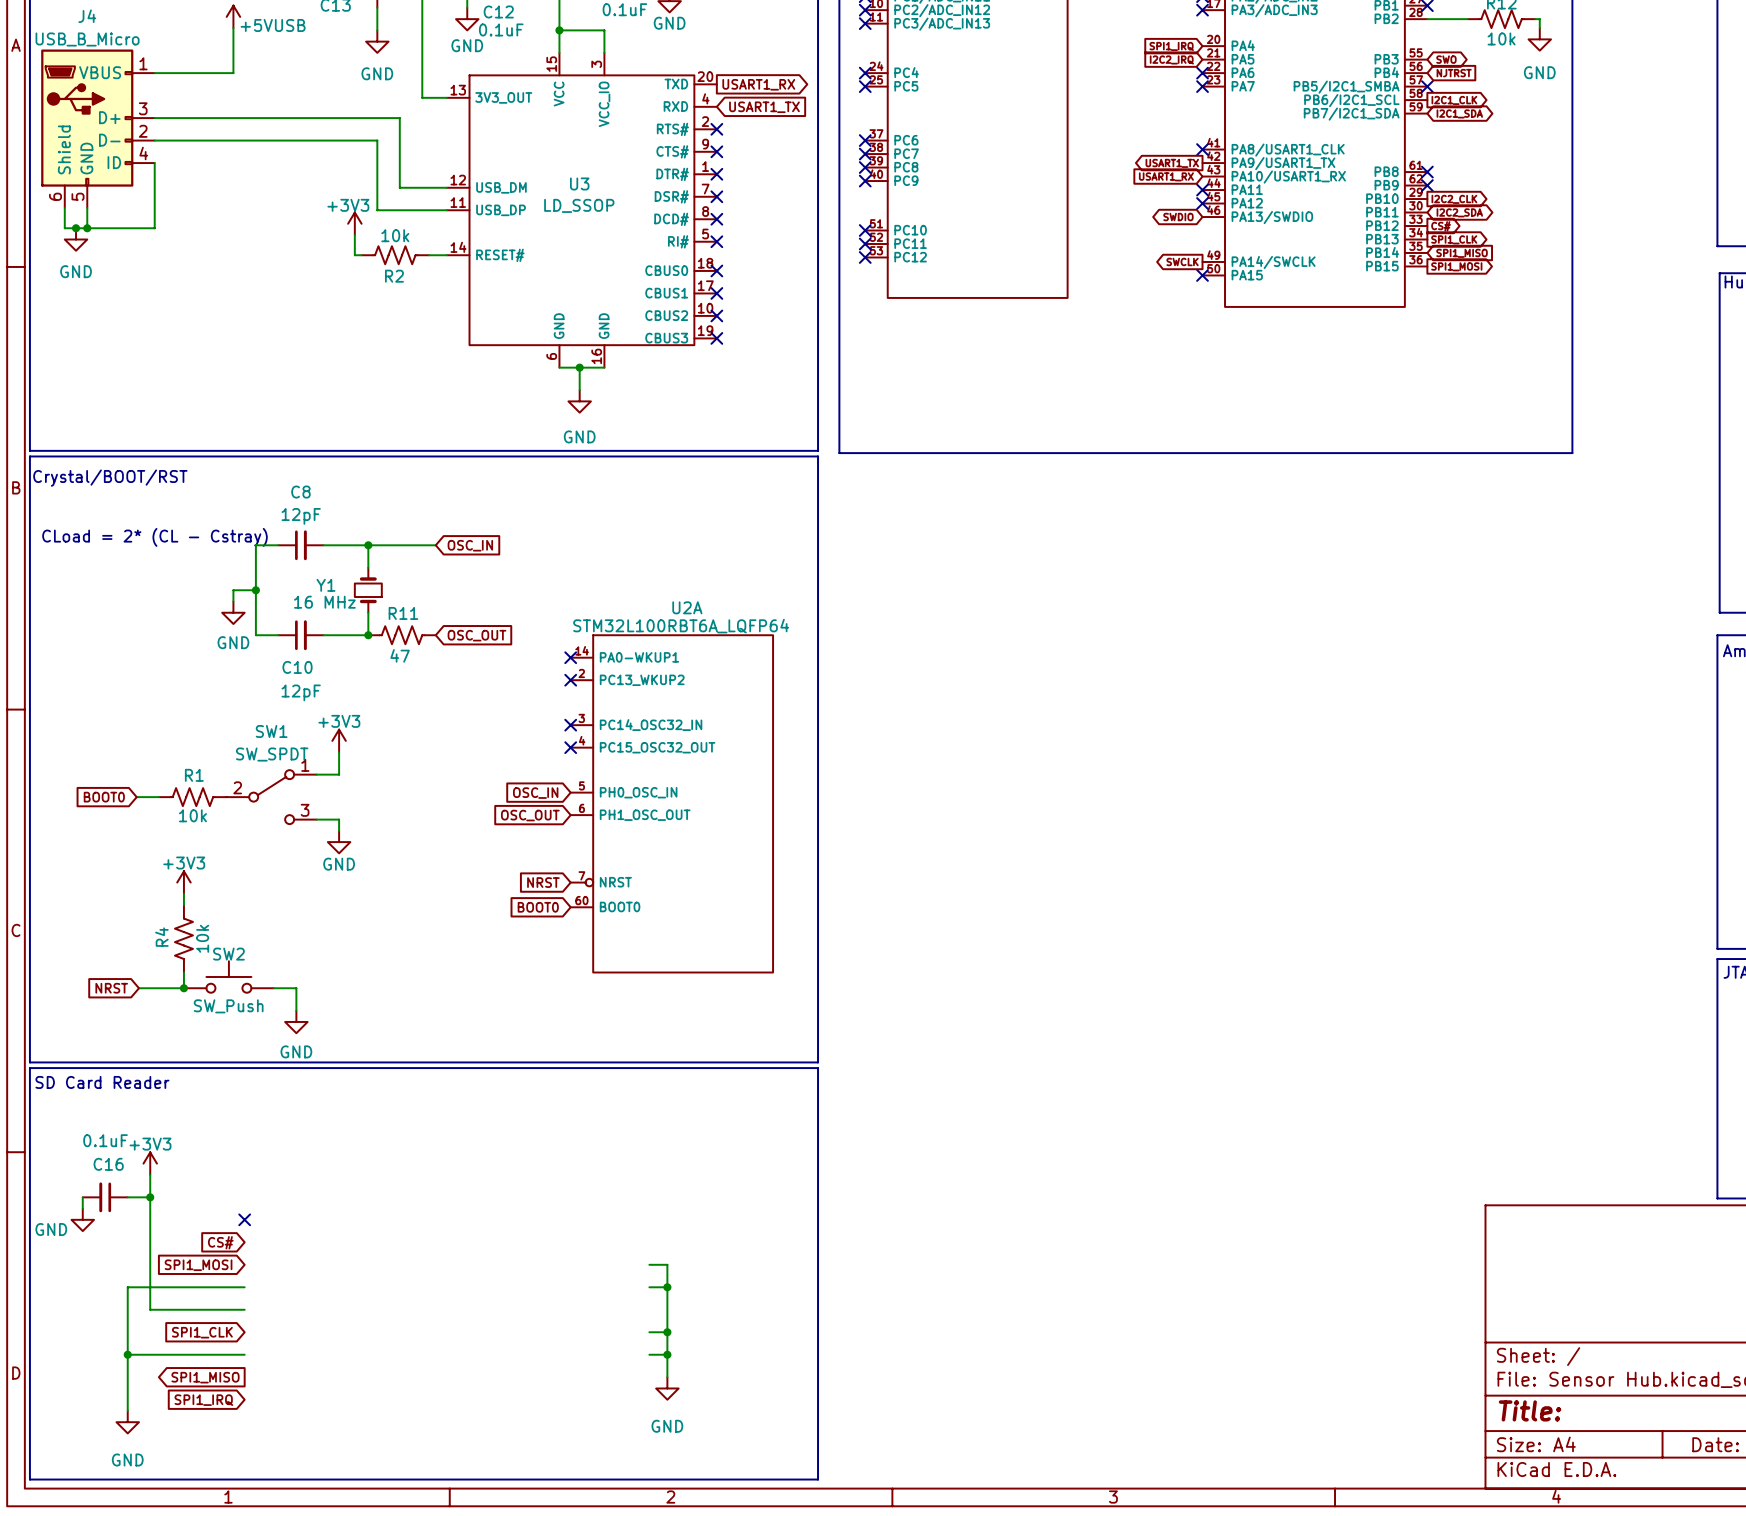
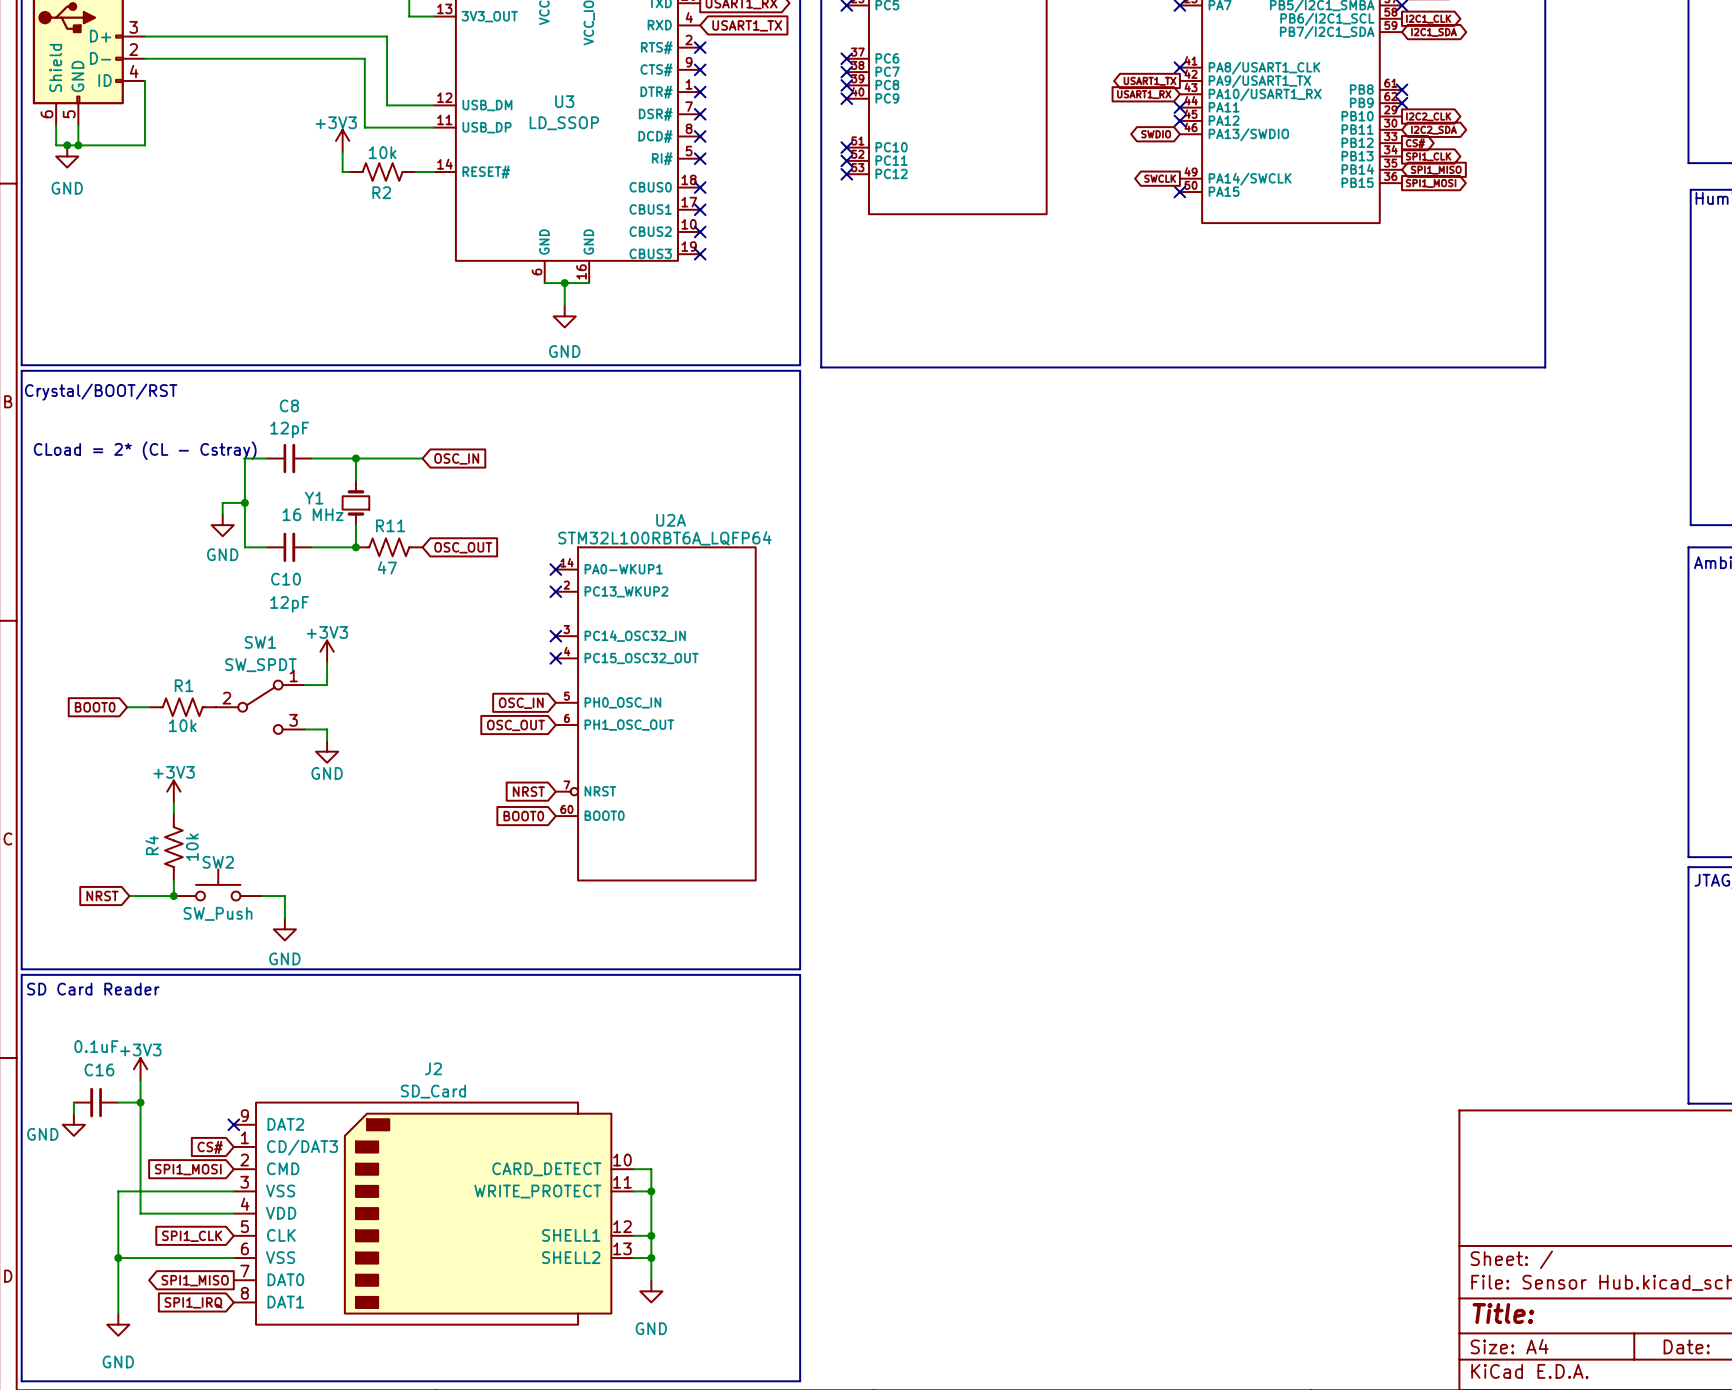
J2: none -> SD_Card (433, 1213)

